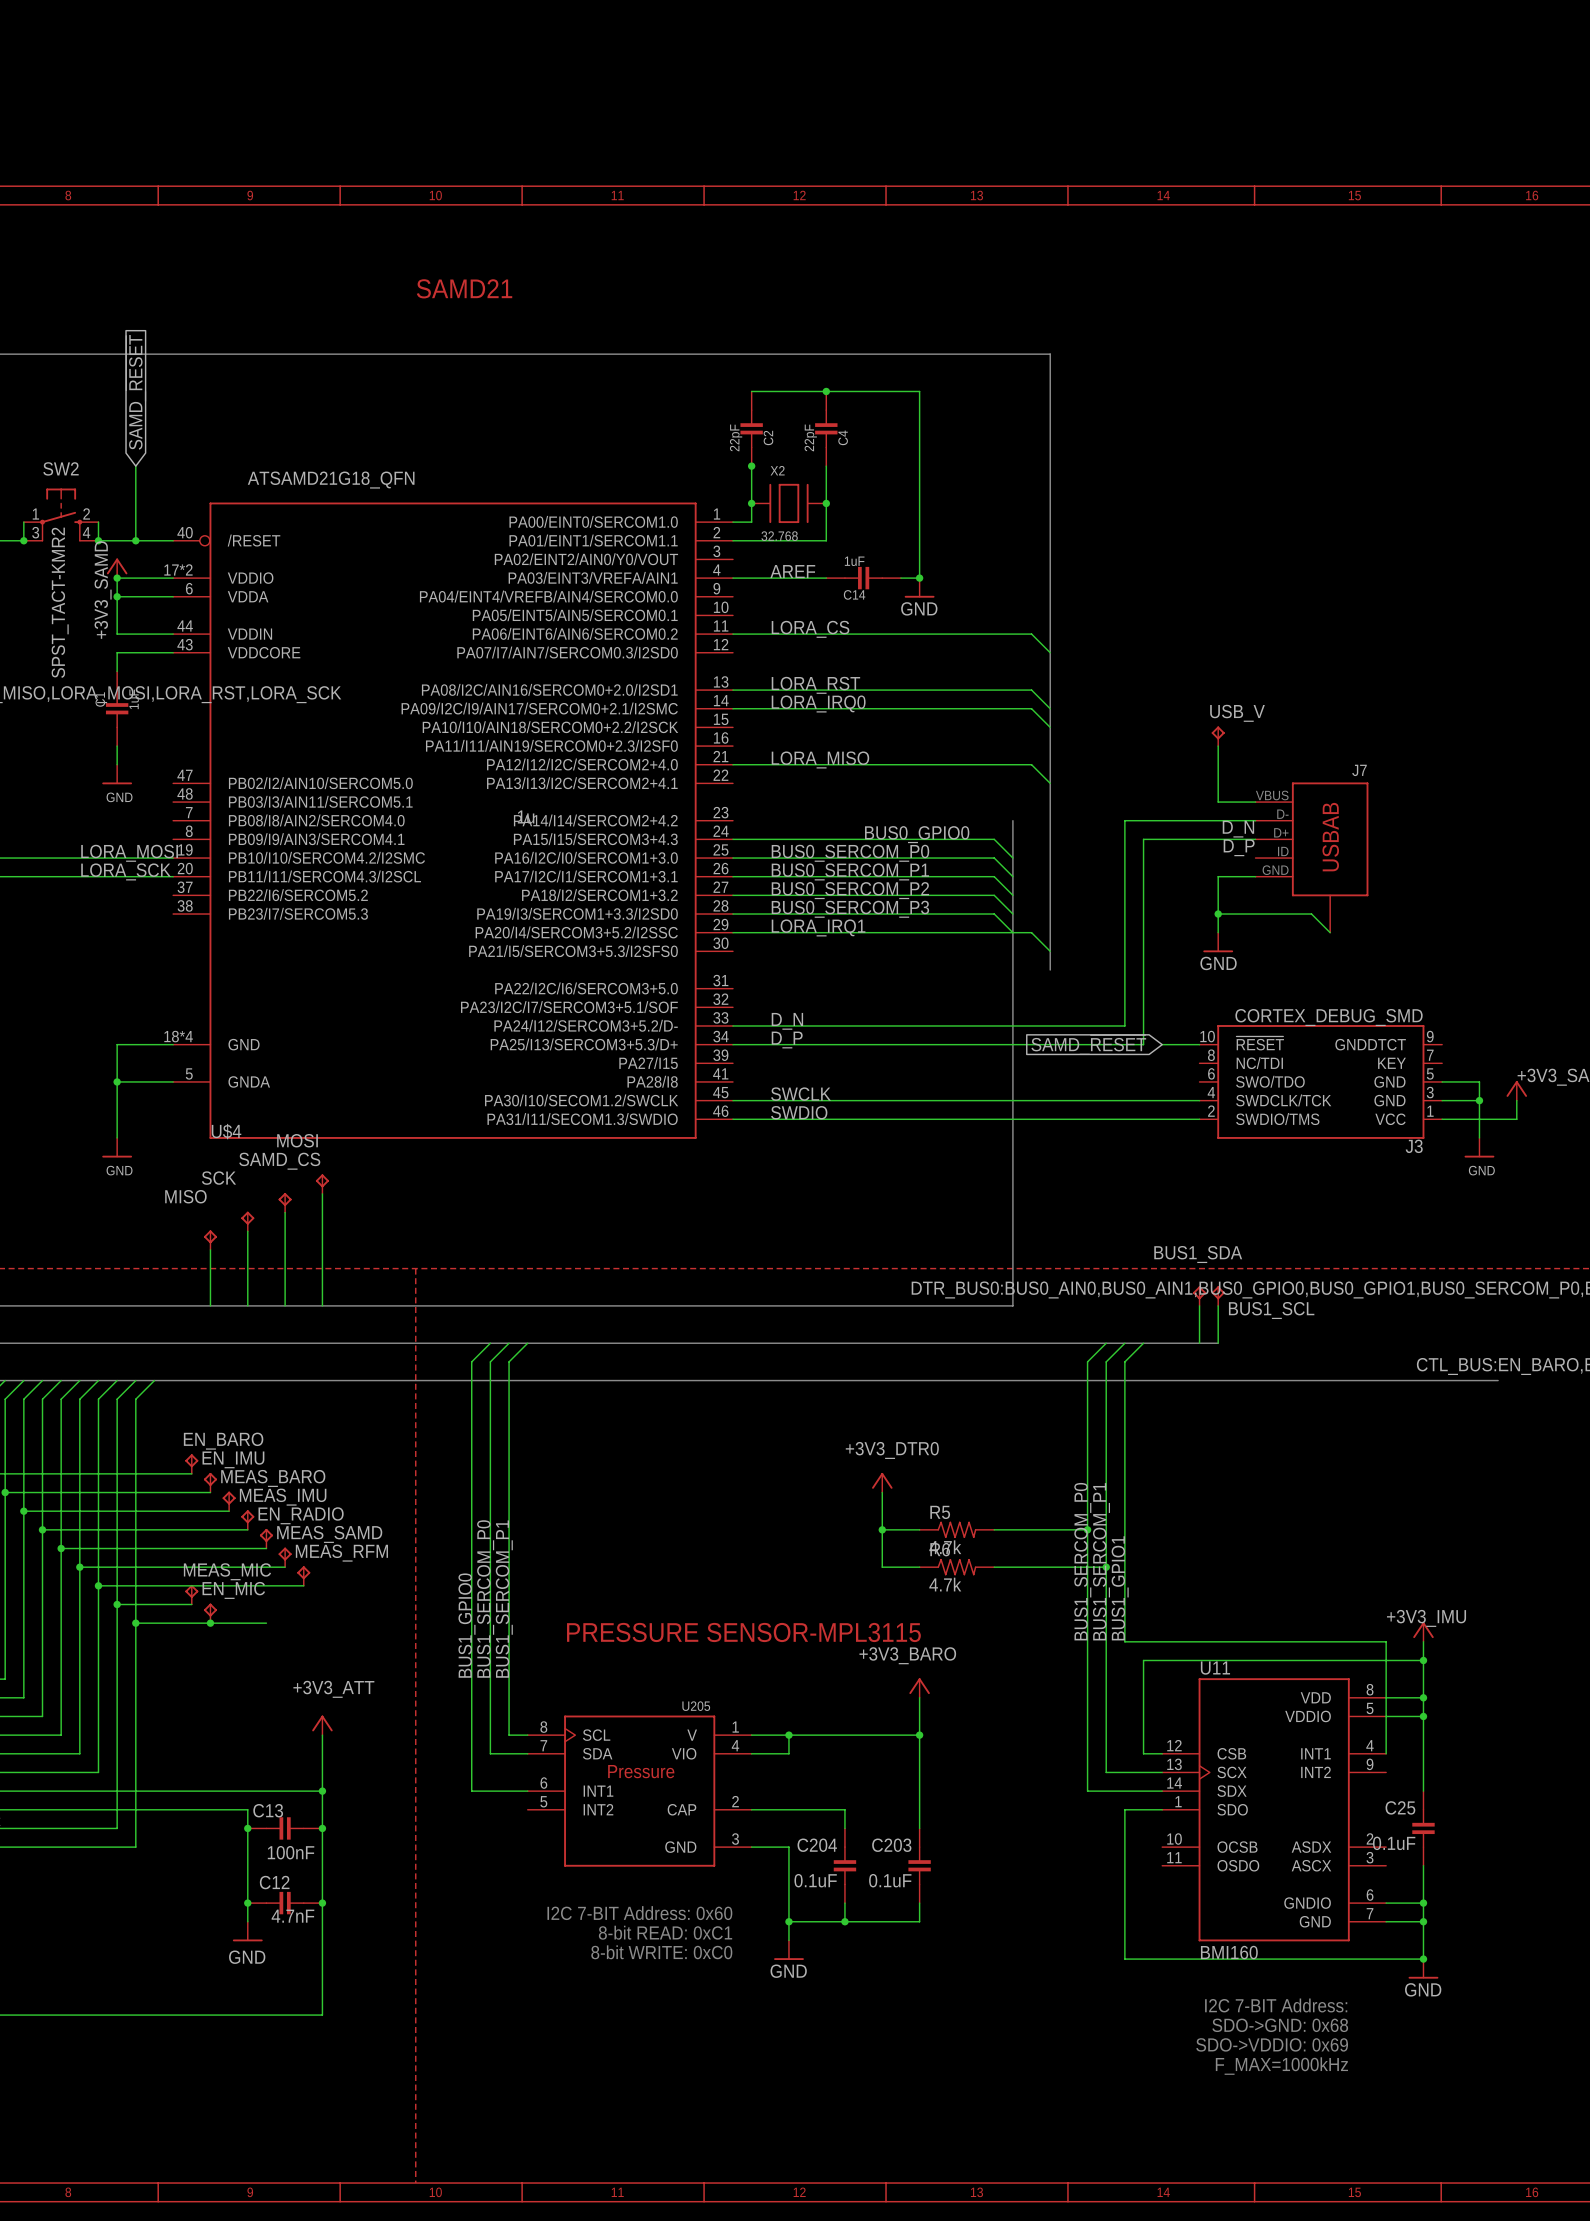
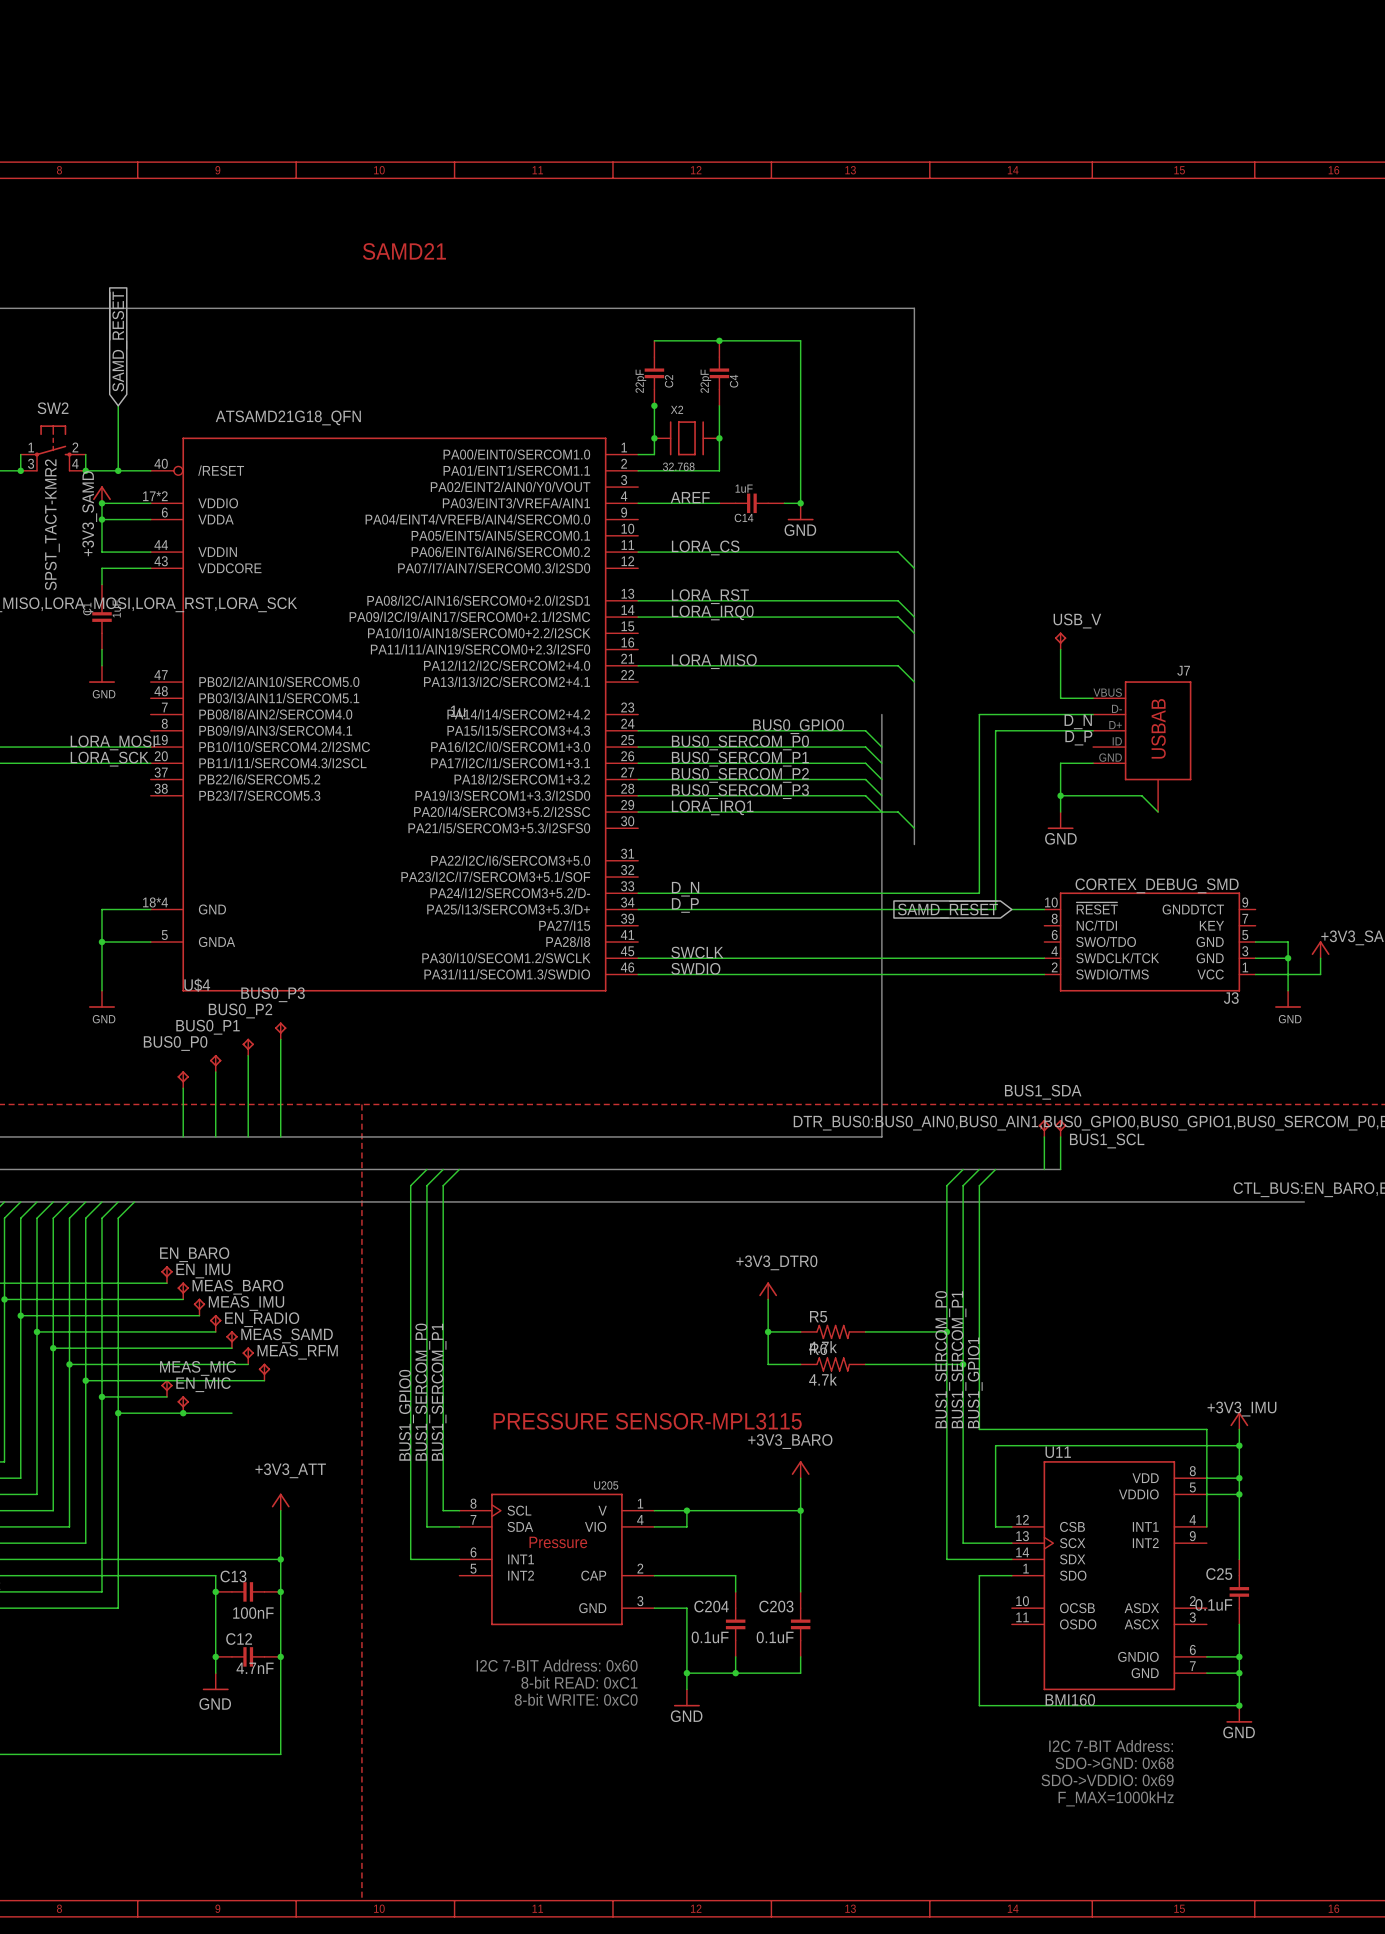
MOSI name: MOSI (297, 1140) -> BUS0_P3 (273, 994)
SAMD_CS name: SAMD_CS (279, 1161) -> BUS0_P2 (240, 1010)
SCK name: SCK (218, 1178) -> BUS0_P1 (208, 1027)
MISO name: MISO (185, 1196) -> BUS0_P0 (175, 1043)

